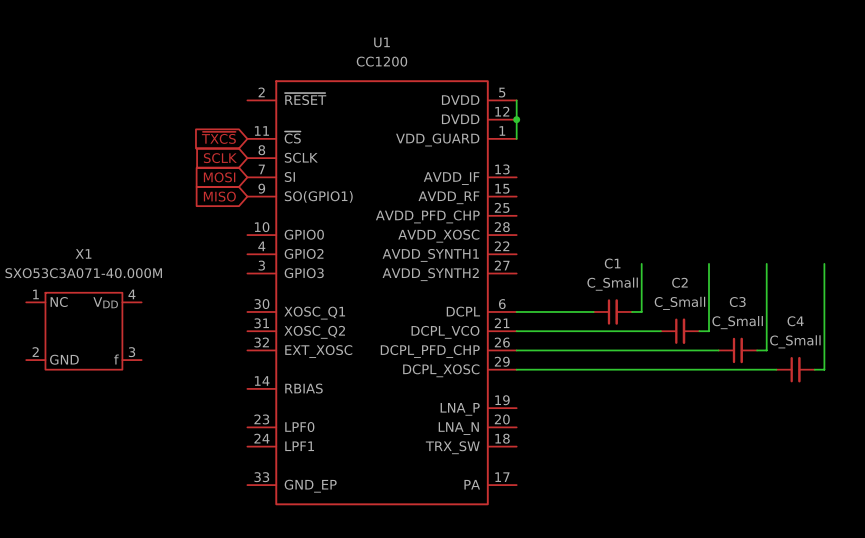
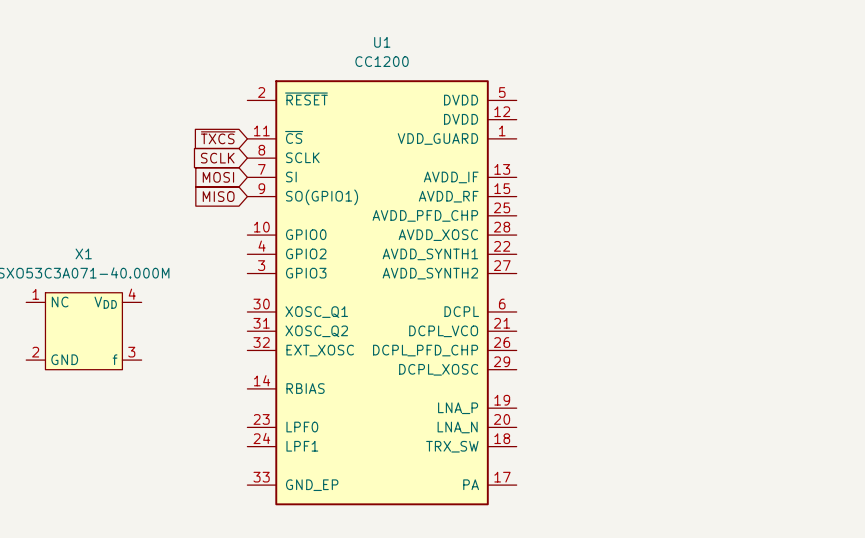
wire: (516, 100) (516, 138) -> none
junction: (516, 119) -> none
wire: (641, 263) (641, 311) (632, 311) -> none
wire: (709, 263) (709, 331) (699, 331) -> none
wire: (766, 263) (766, 350) (757, 350) -> none
wire: (824, 263) (824, 369) (814, 369) -> none
wire: (516, 311) (593, 311) -> none
C1: C_Small (612, 311) -> none
wire: (516, 331) (660, 331) -> none
C2: C_Small (680, 331) -> none
wire: (516, 350) (718, 350) -> none
C3: C_Small (737, 350) -> none
wire: (516, 369) (776, 369) -> none
C4: C_Small (795, 369) -> none

